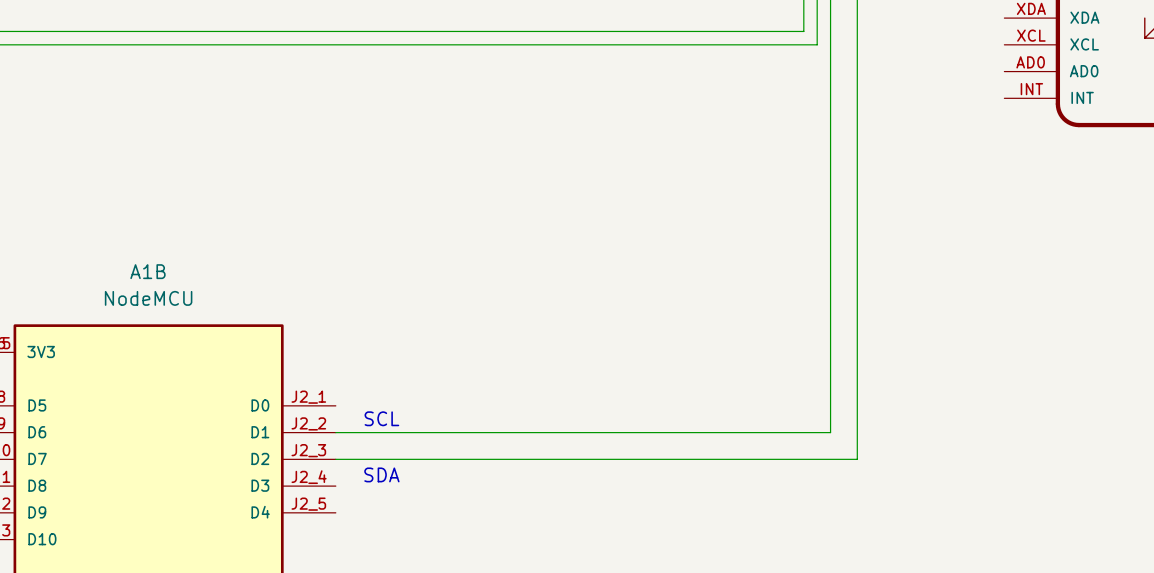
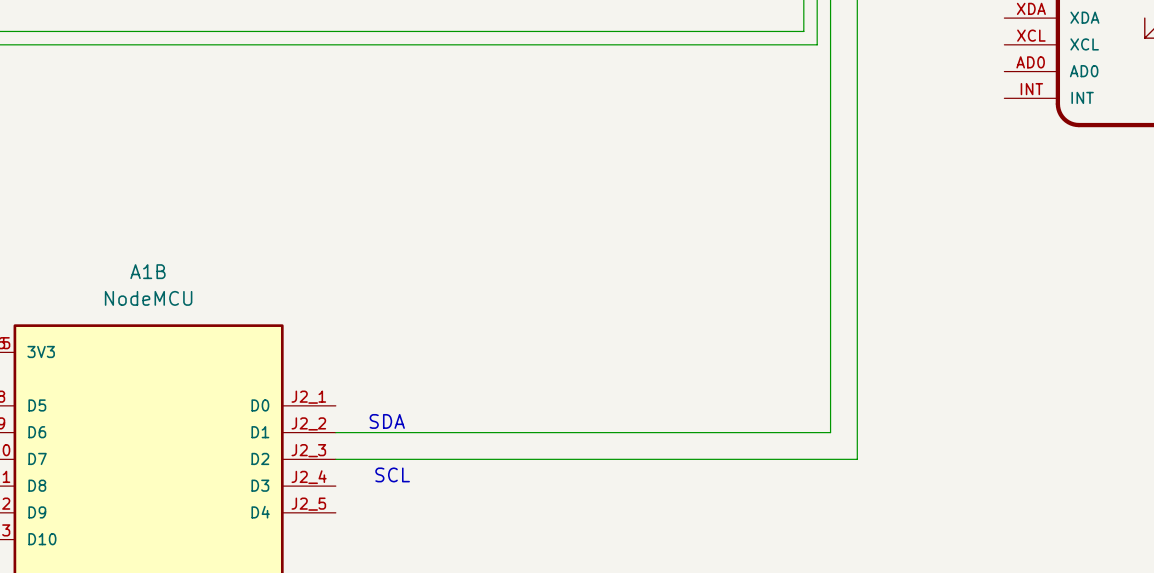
text position: SCL (381, 418) -> SCL (392, 474)
text position: SDA (381, 474) -> SDA (387, 421)

